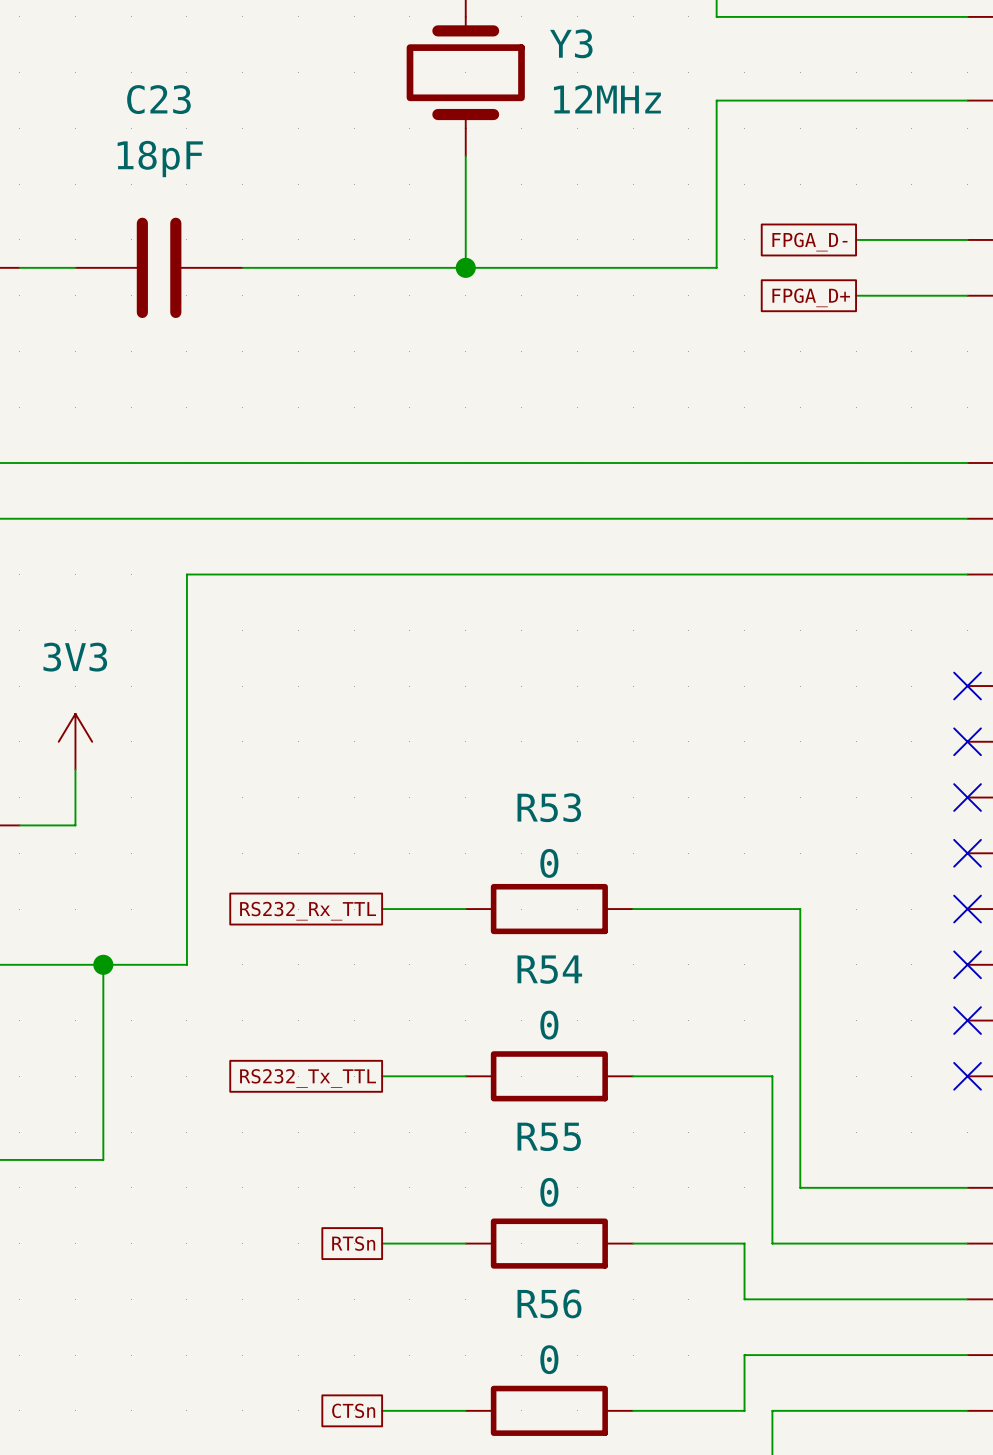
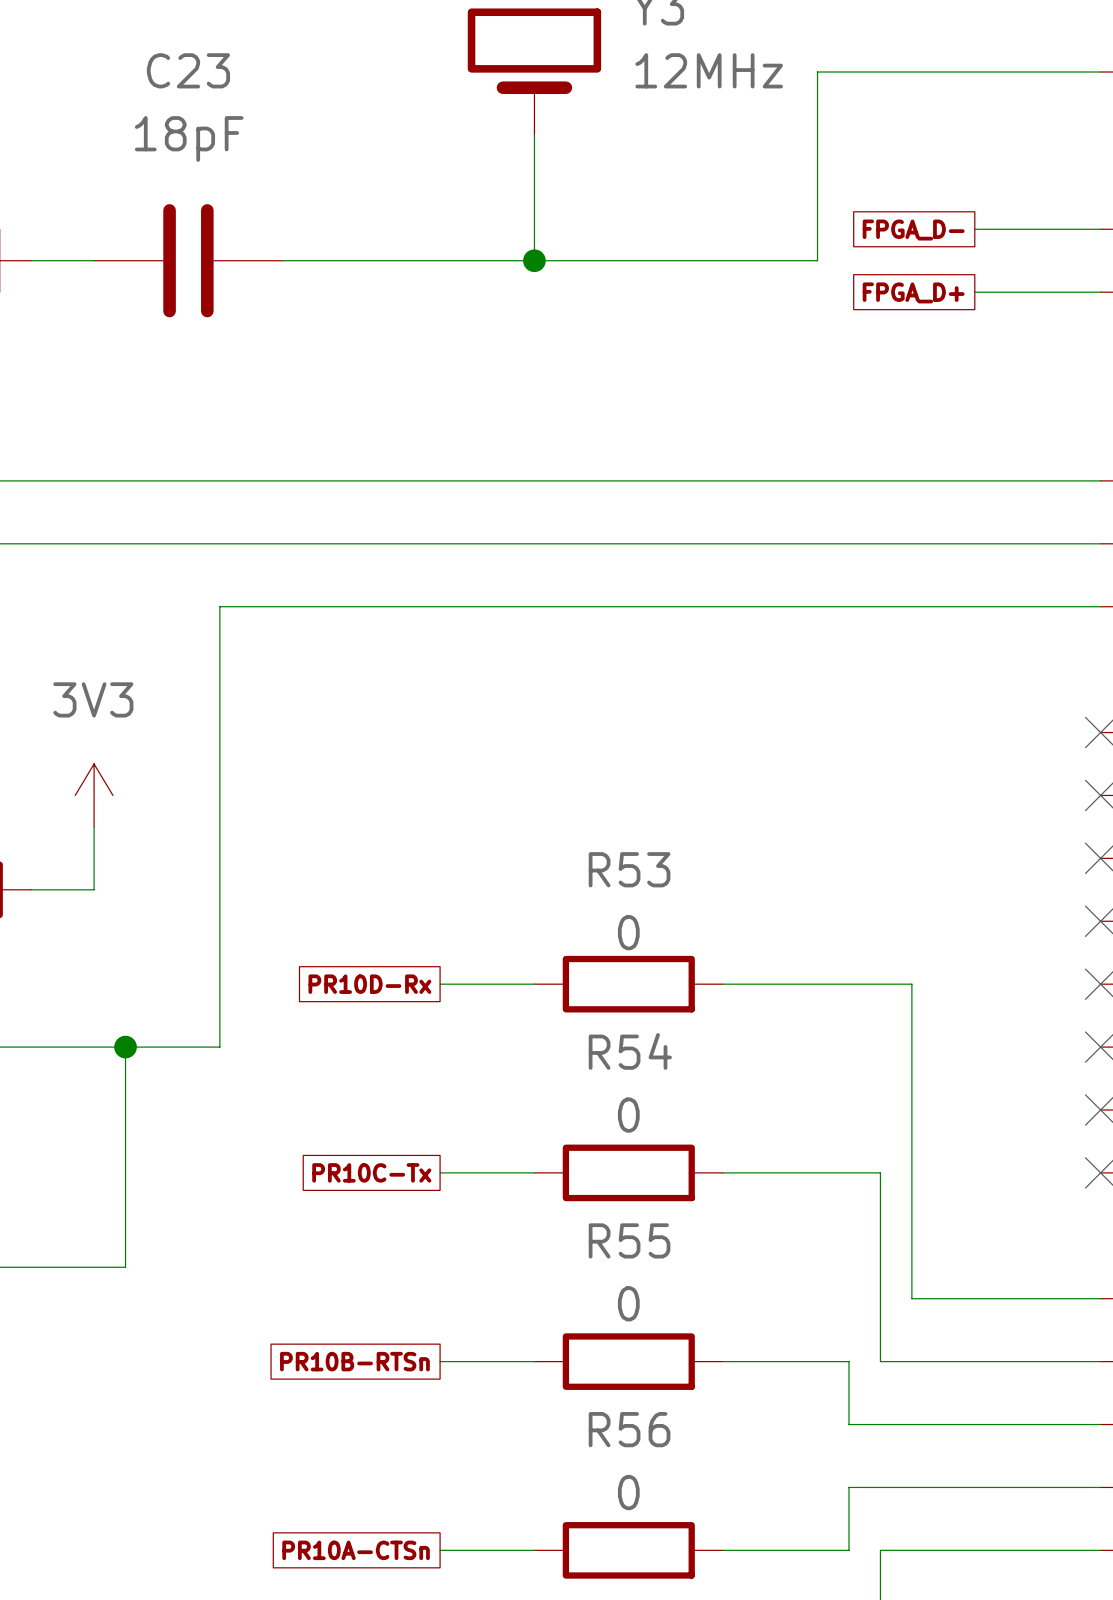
global label: RS232_Rx_TTL (308, 911) -> PR10D-Rx (369, 984)
global label: RS232_Tx_TTL (308, 1078) -> PR10C-Tx (371, 1172)
global label: RTSn (353, 1243) -> PR10B-RTSn (354, 1361)
global label: CTSn (353, 1410) -> PR10A-CTSn (356, 1550)

